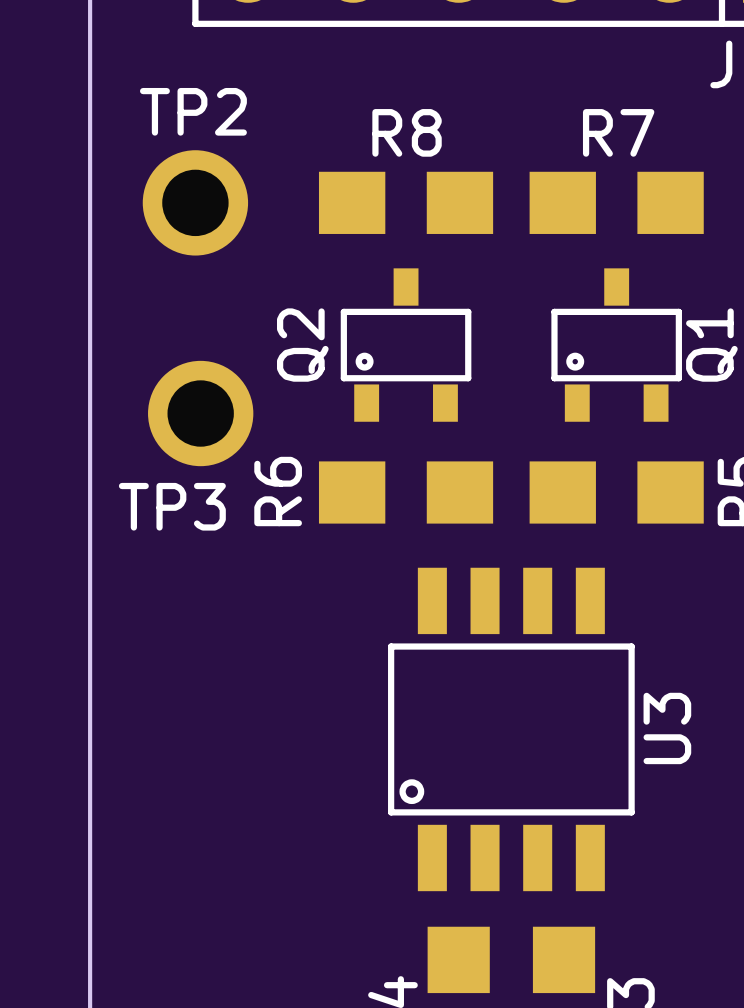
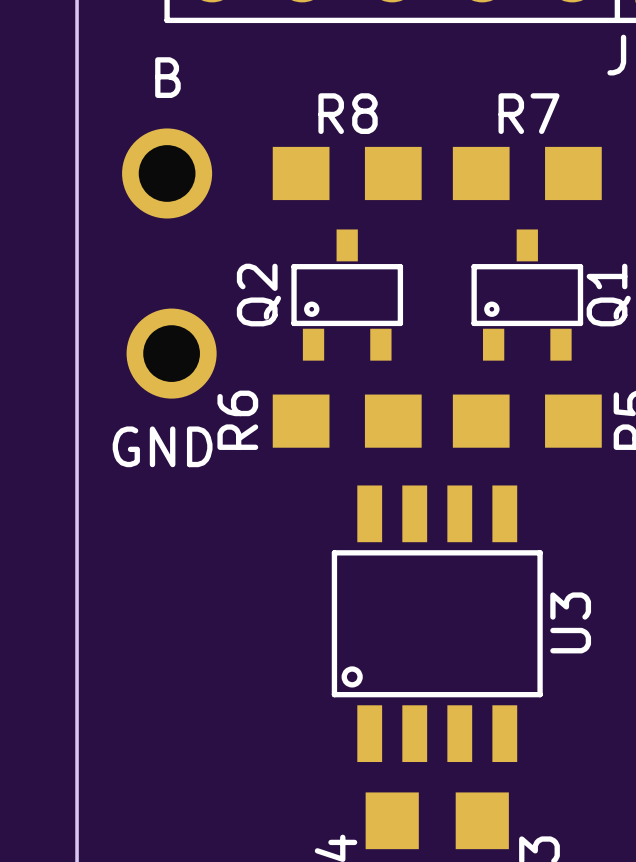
text: none -> B (167, 77)
TP2 name: TP2 (193, 111) -> none
TP3 name: TP3 (172, 506) -> none
text: none -> GND (162, 446)

